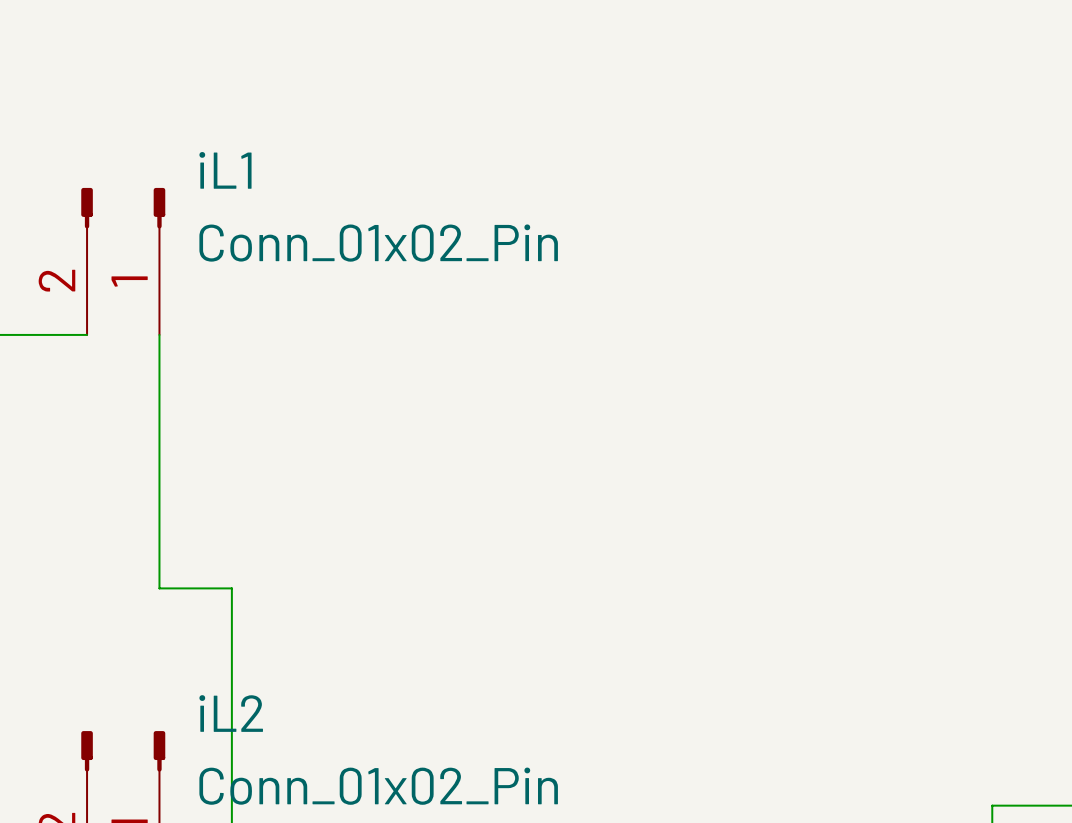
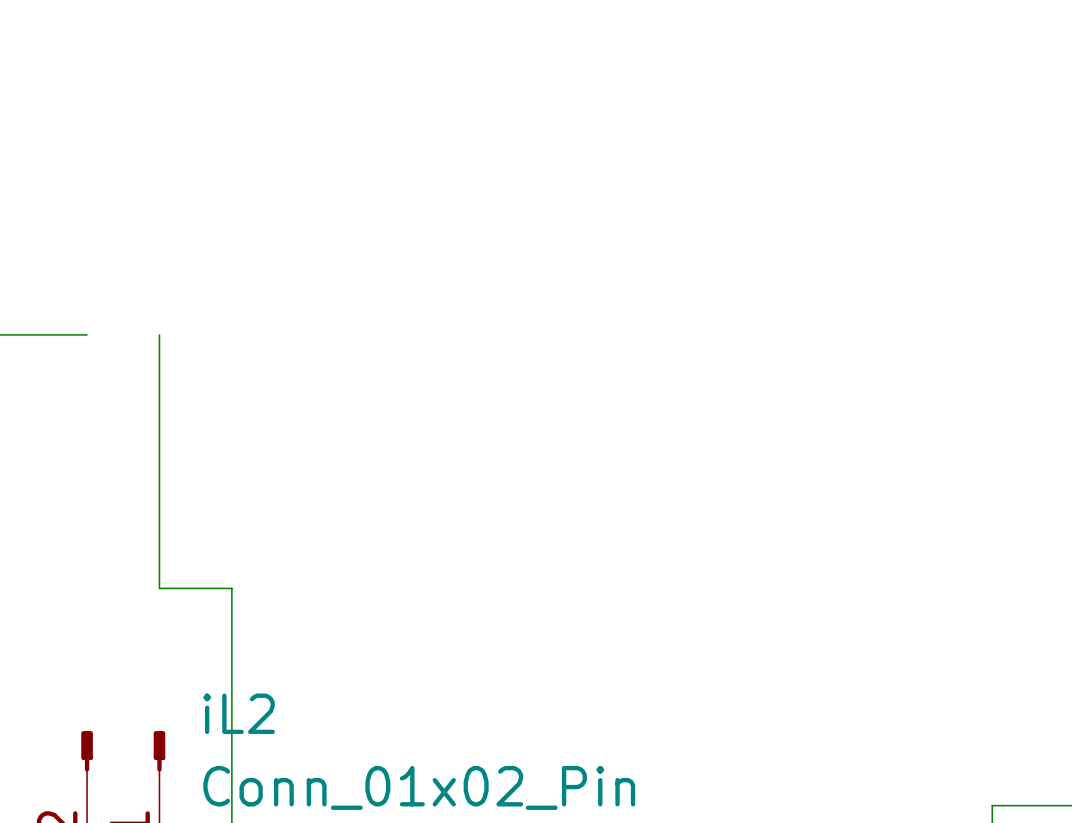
iL1: Conn_01x02_Pin (123, 261) -> none

